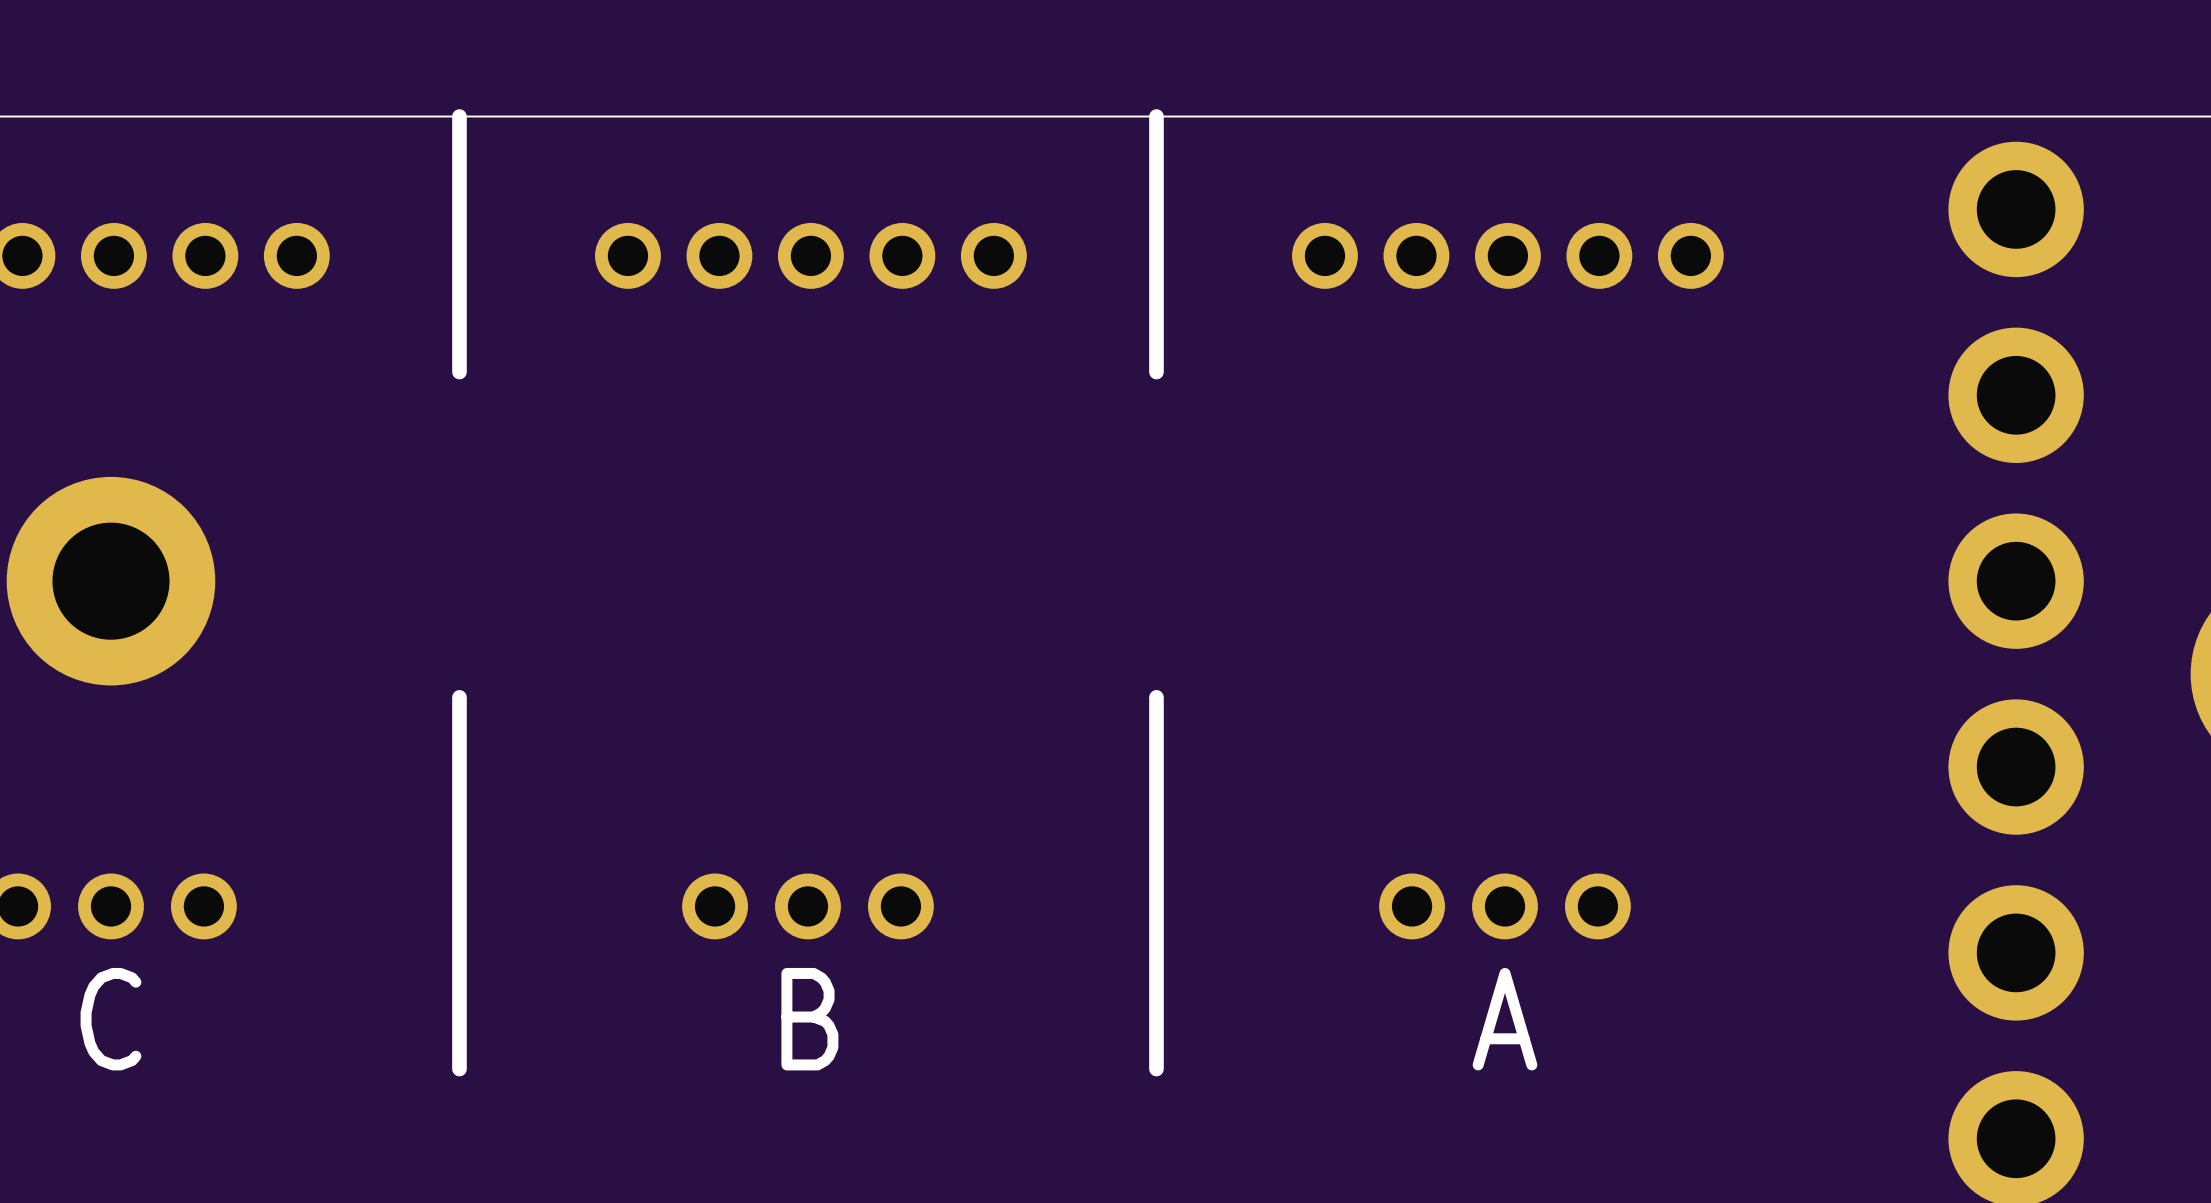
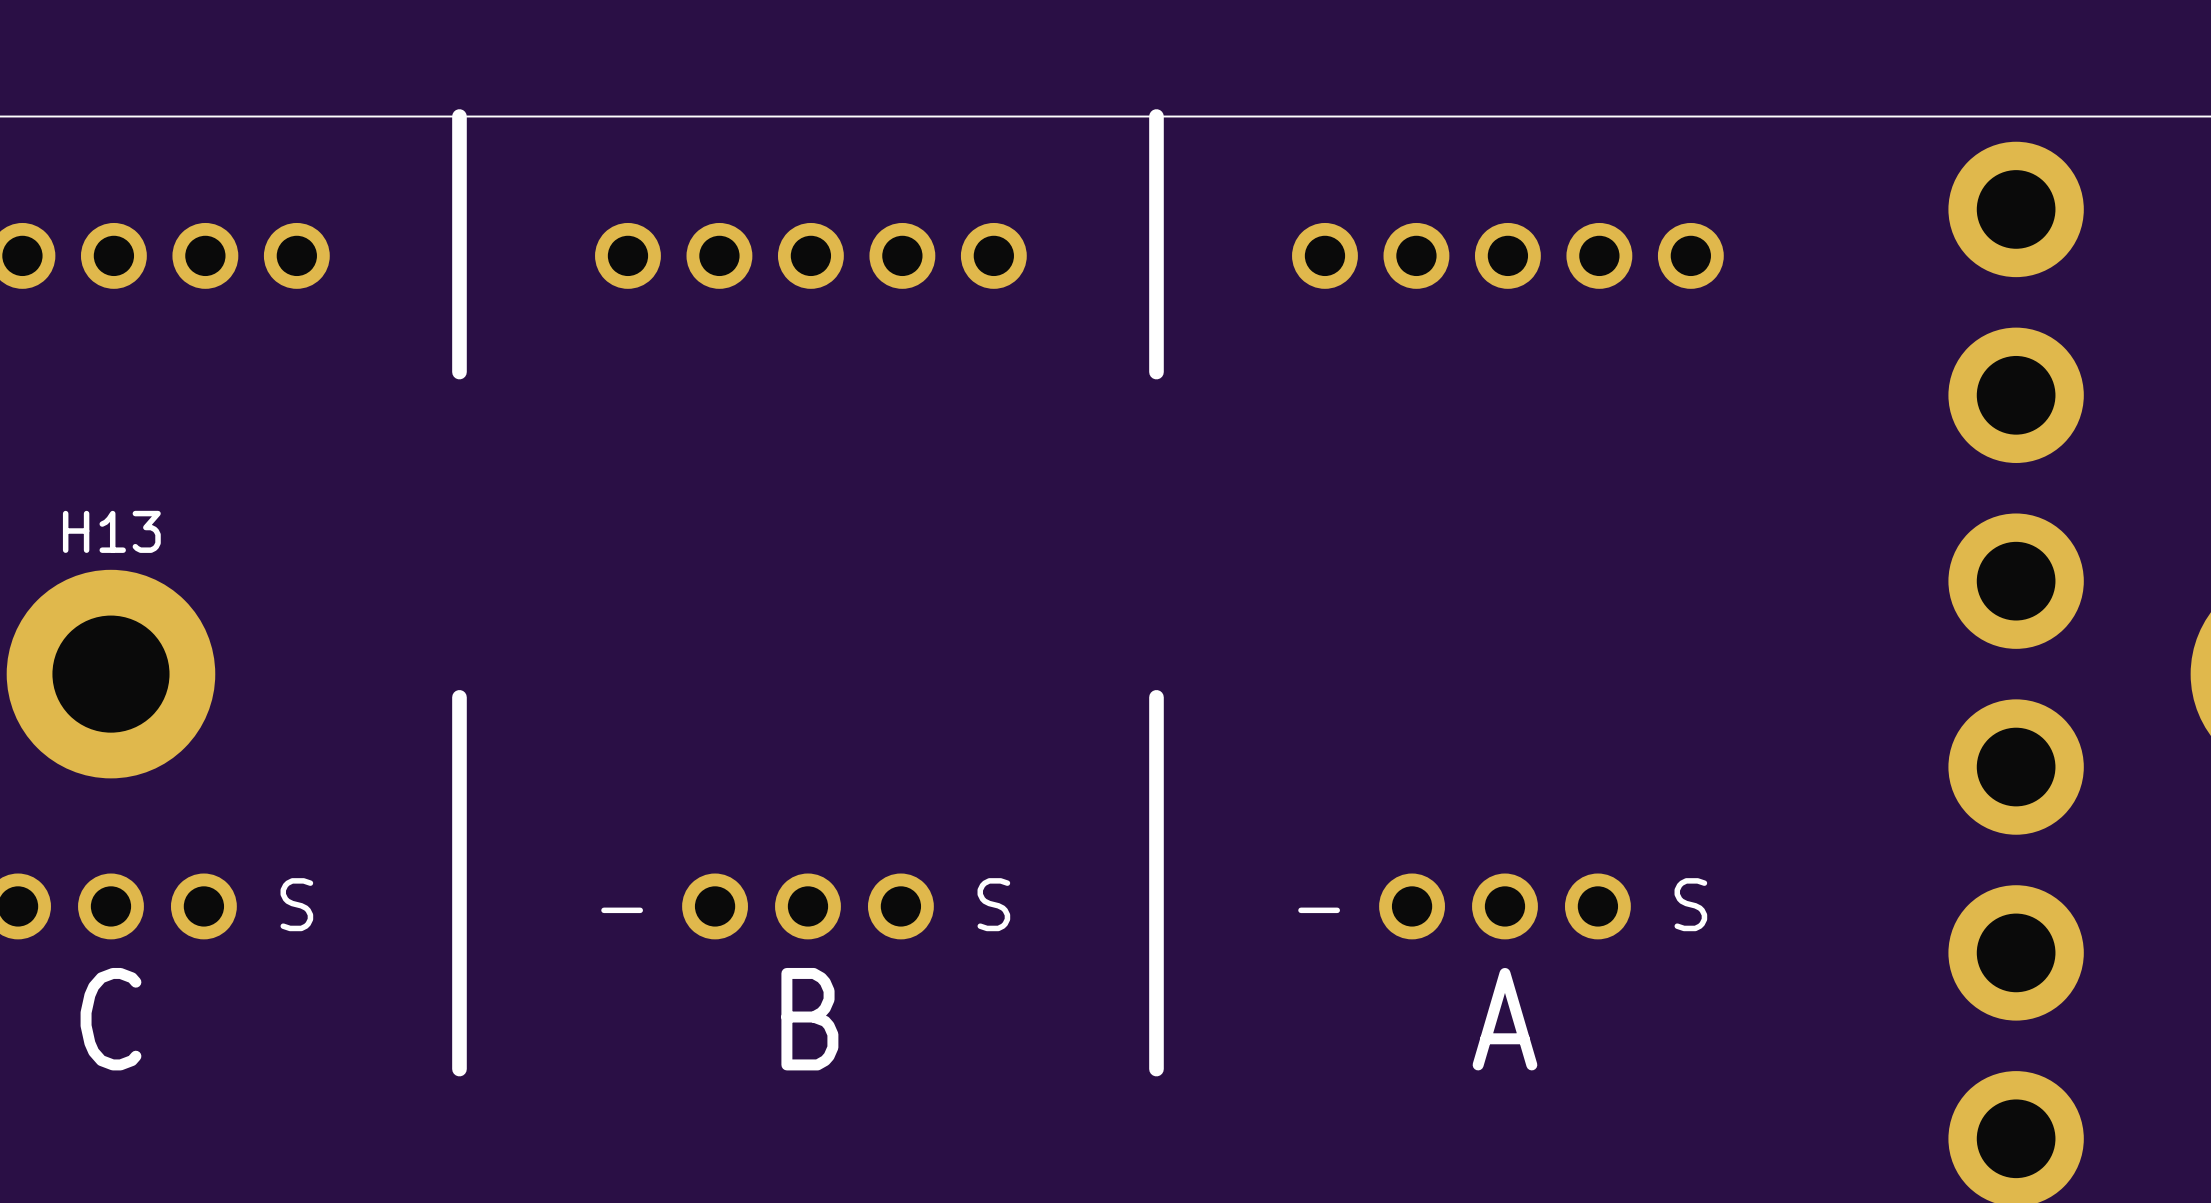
H13 position: (110, 581) -> (110, 674)
text: none -> S (296, 904)
text: none -> S (993, 904)
text: none -> S (1690, 904)
text: none -> - (622, 910)
text: none -> - (1319, 910)

